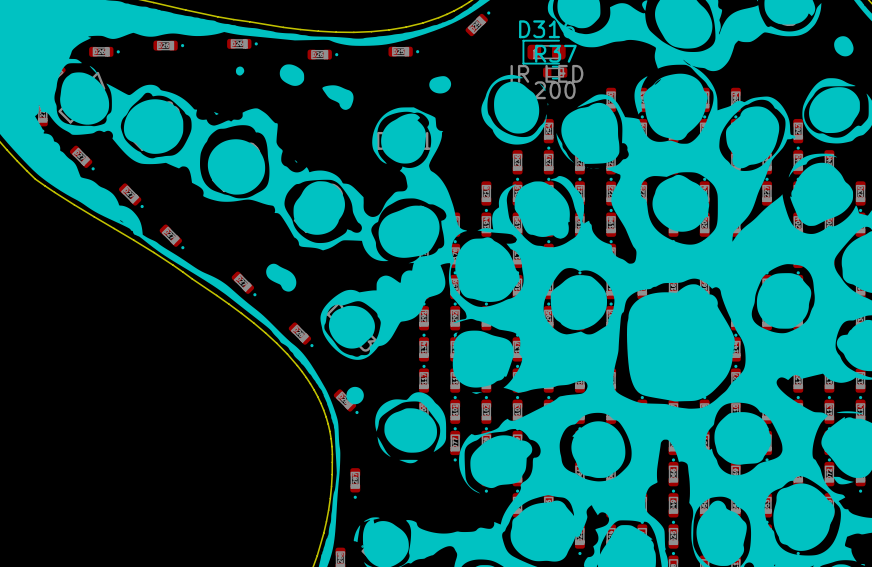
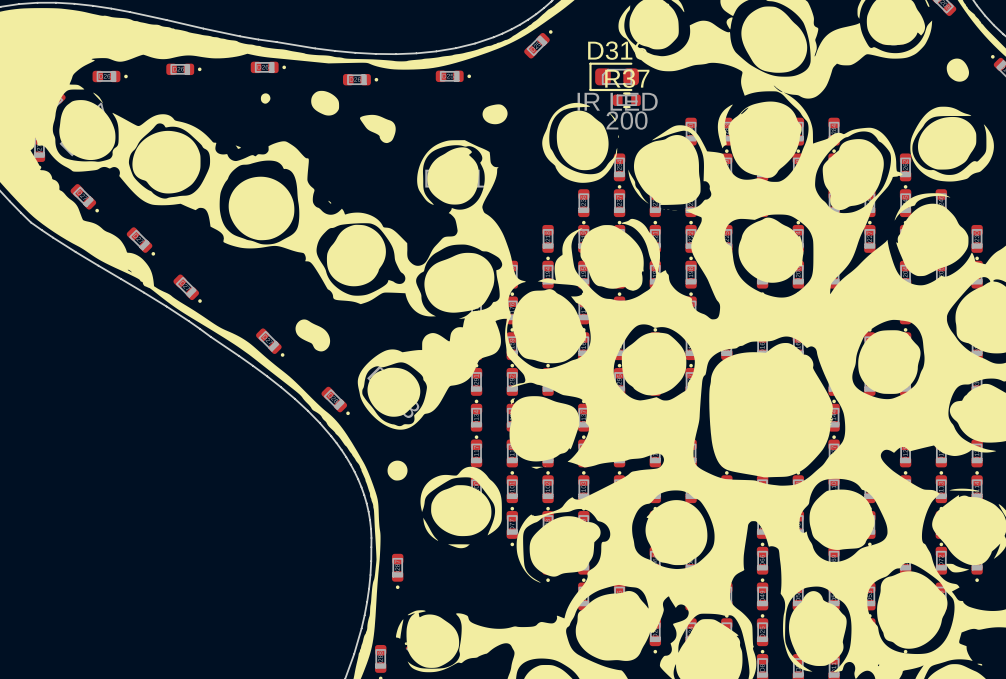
part: (346, 401) -> none

